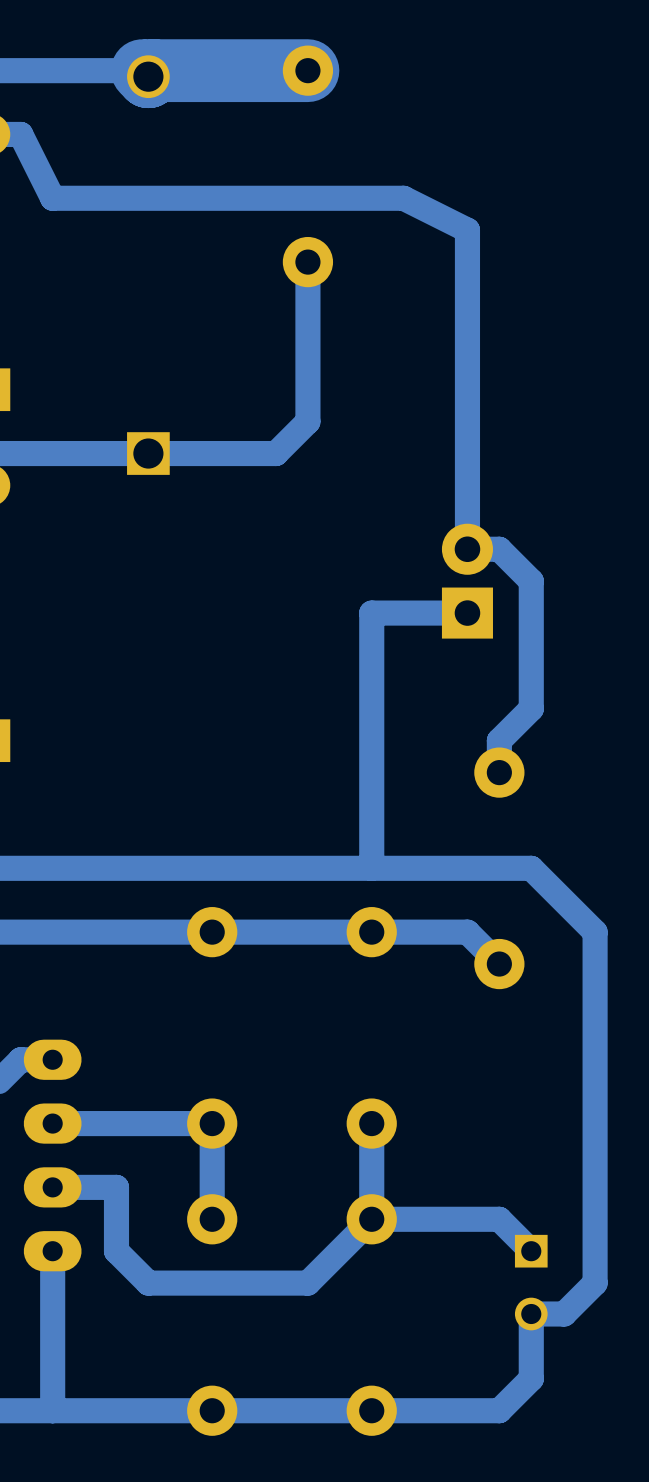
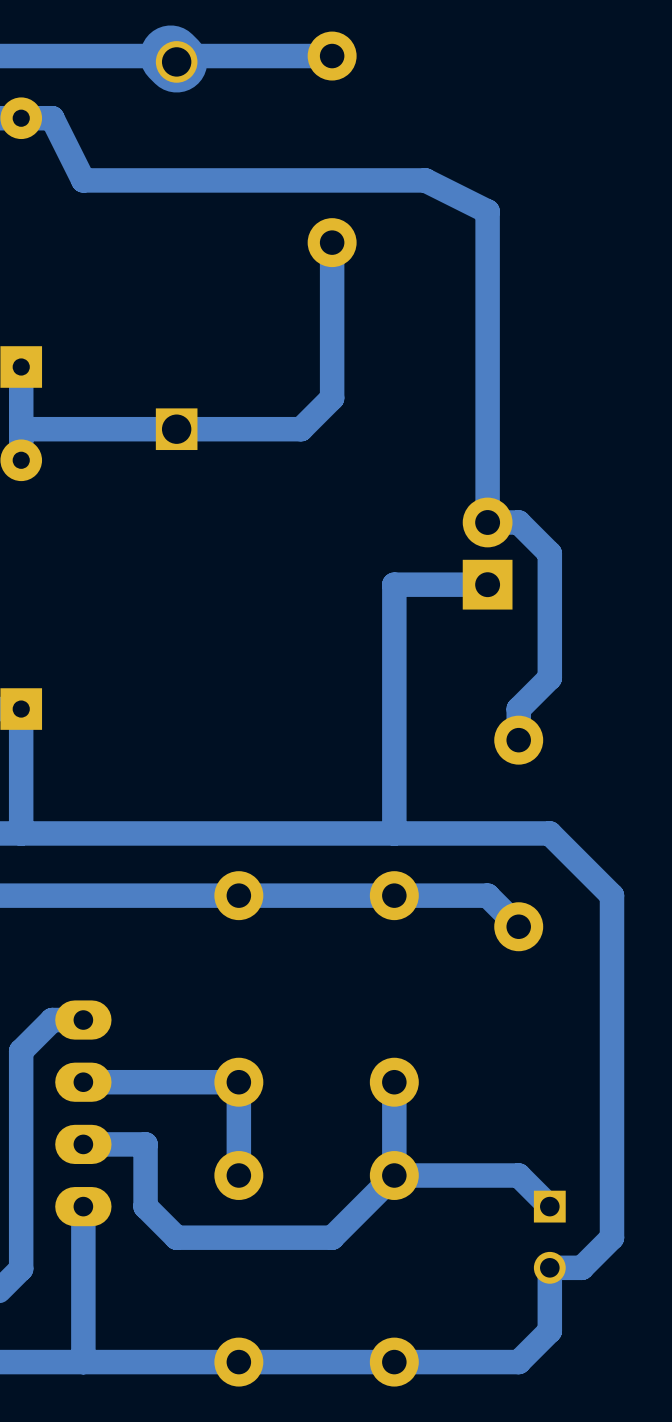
track width: thick (307, 70) (154, 70) (148, 76) (148, 70) -> thin (332, 56) (182, 56) (176, 61) (176, 56)

